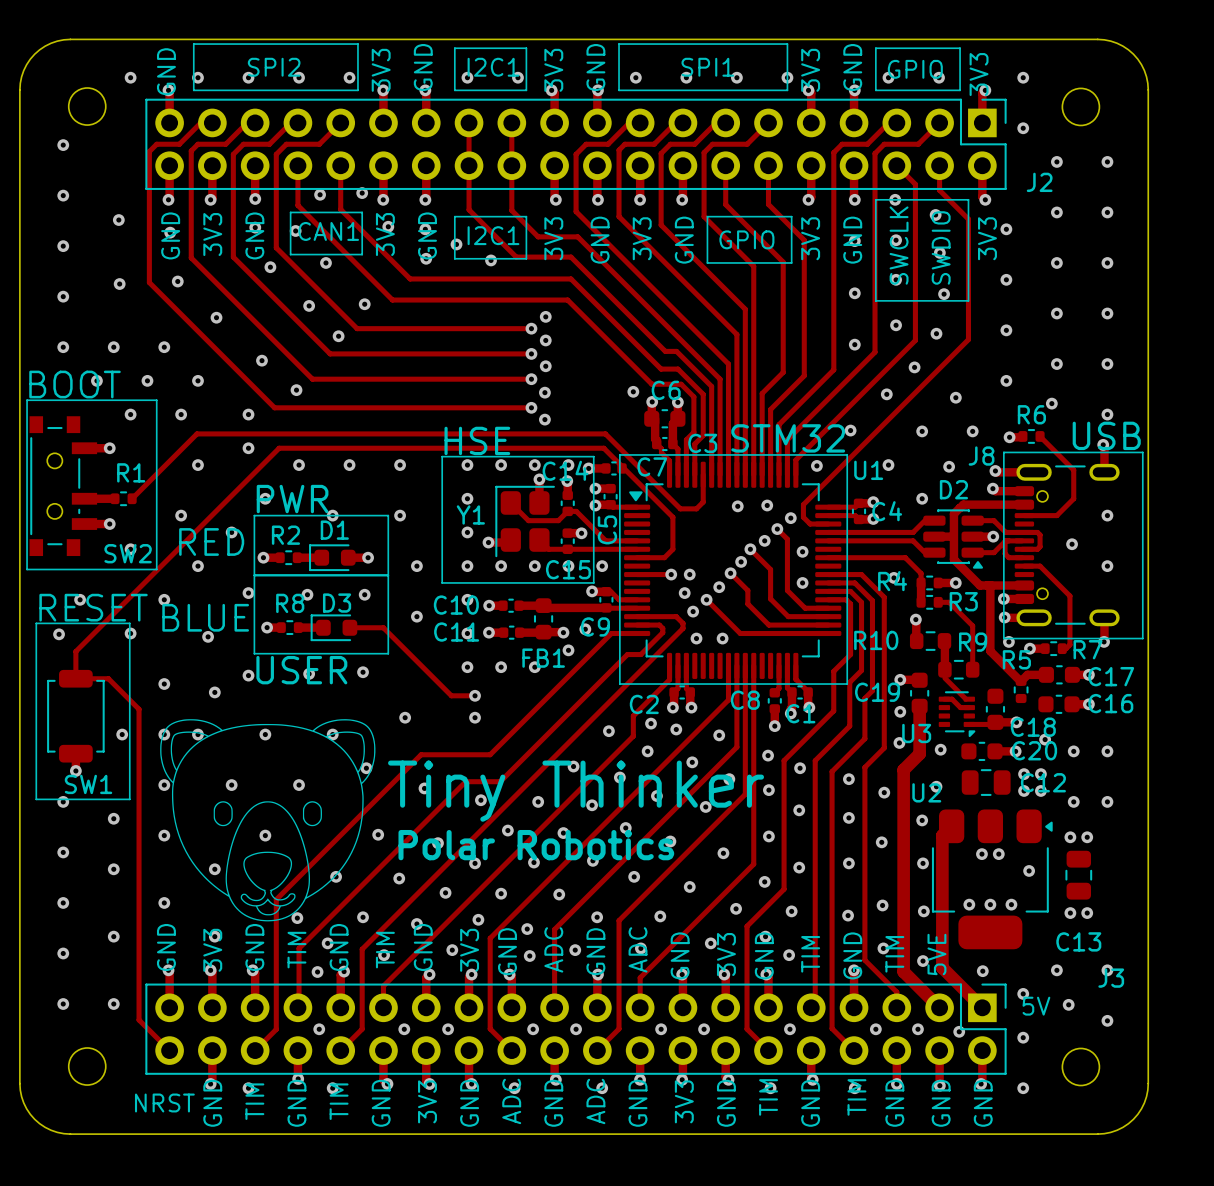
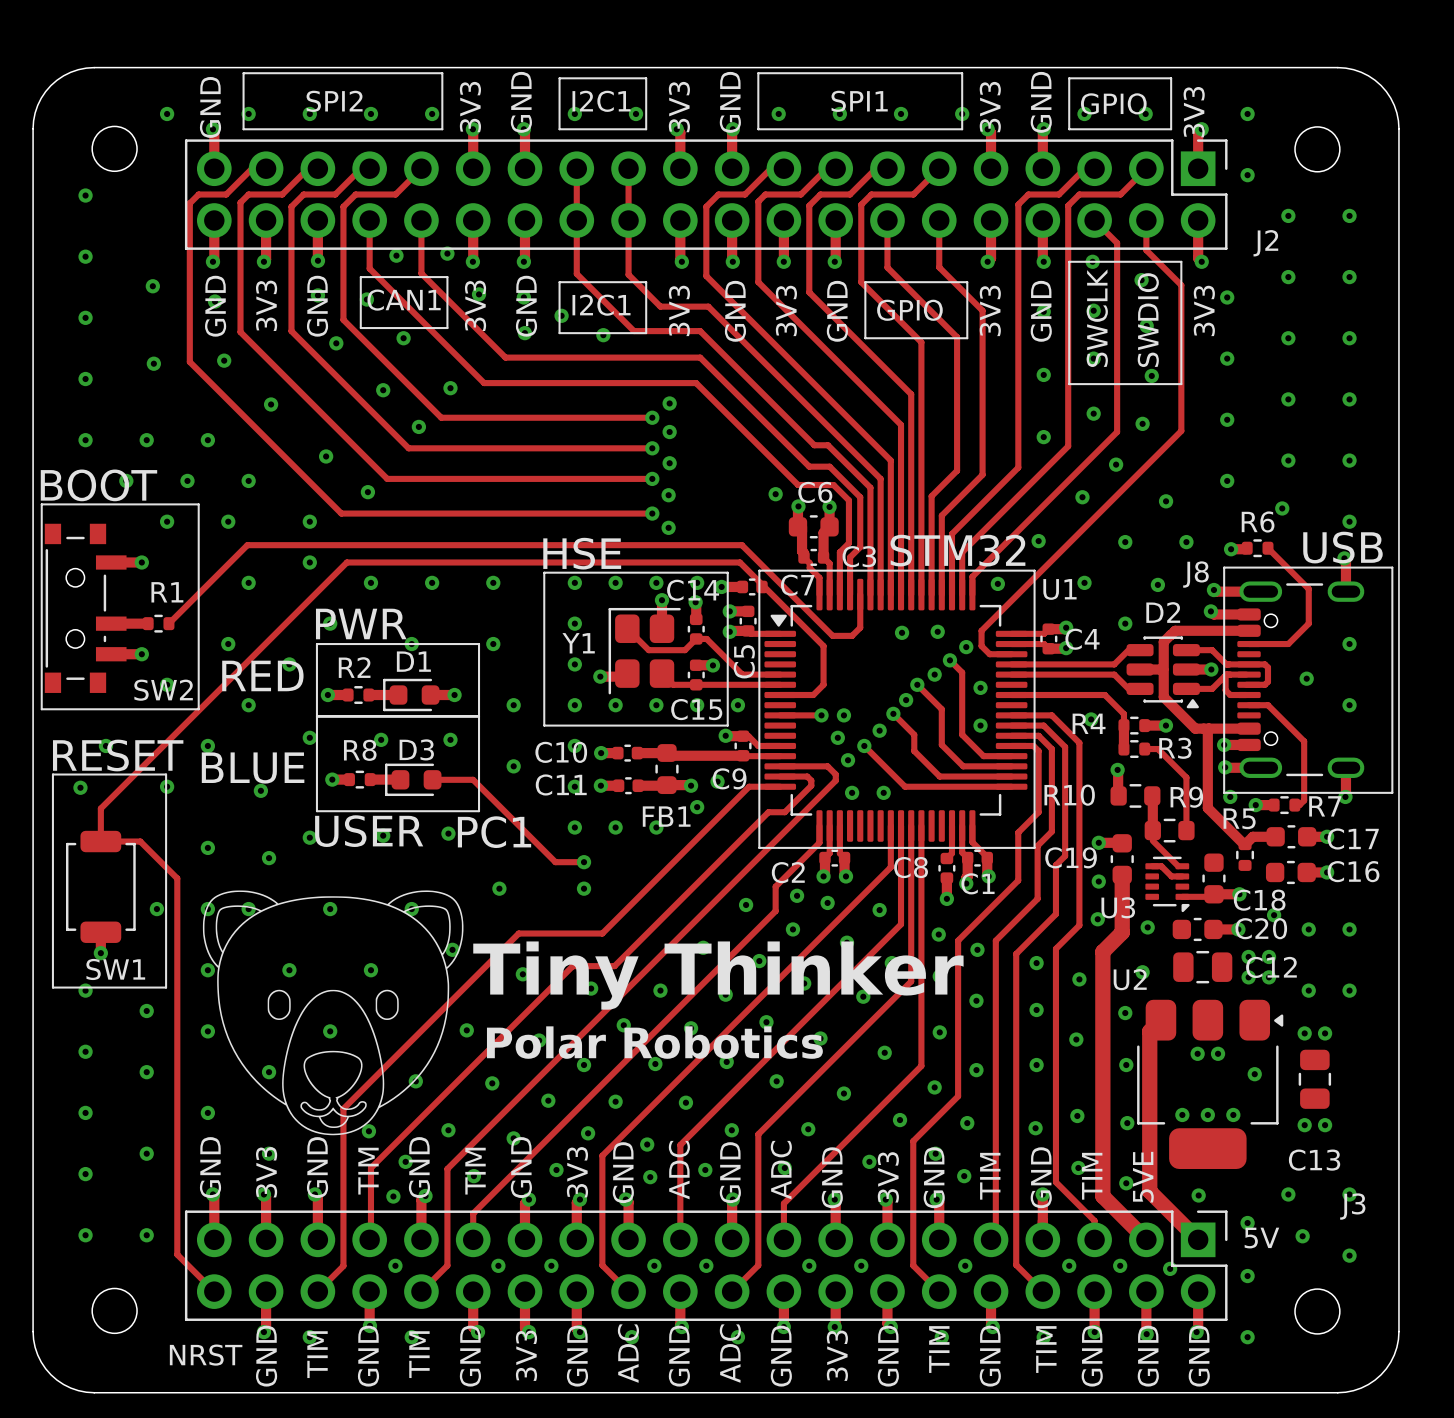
text: none -> PC1 (494, 832)

